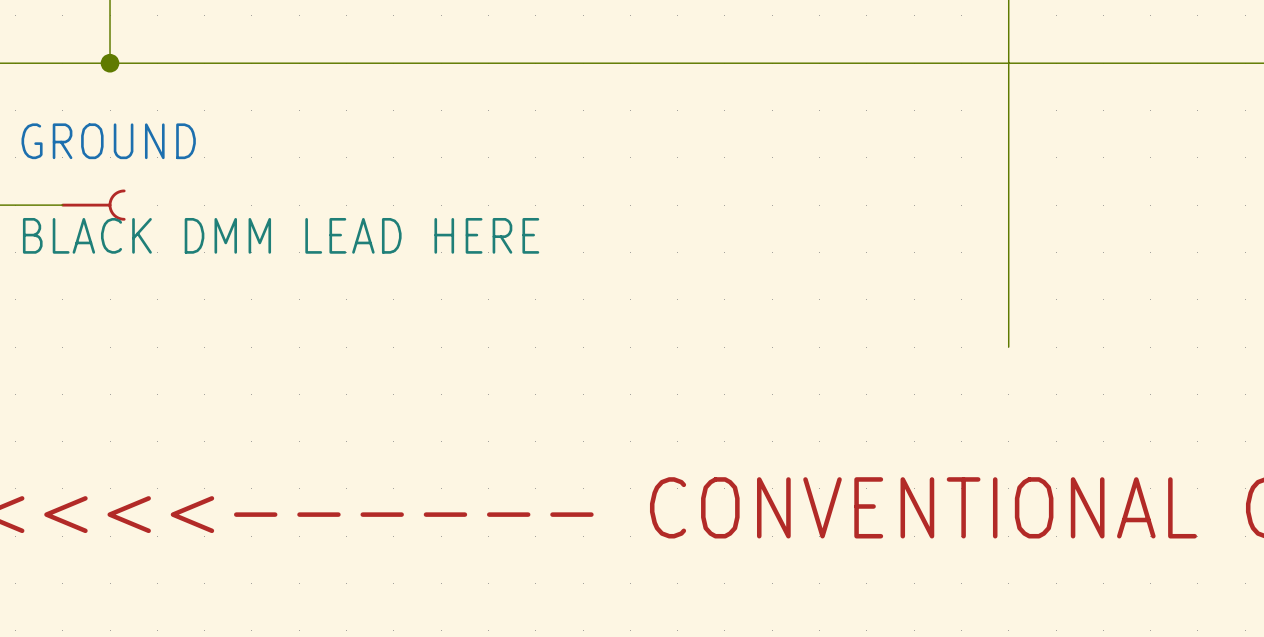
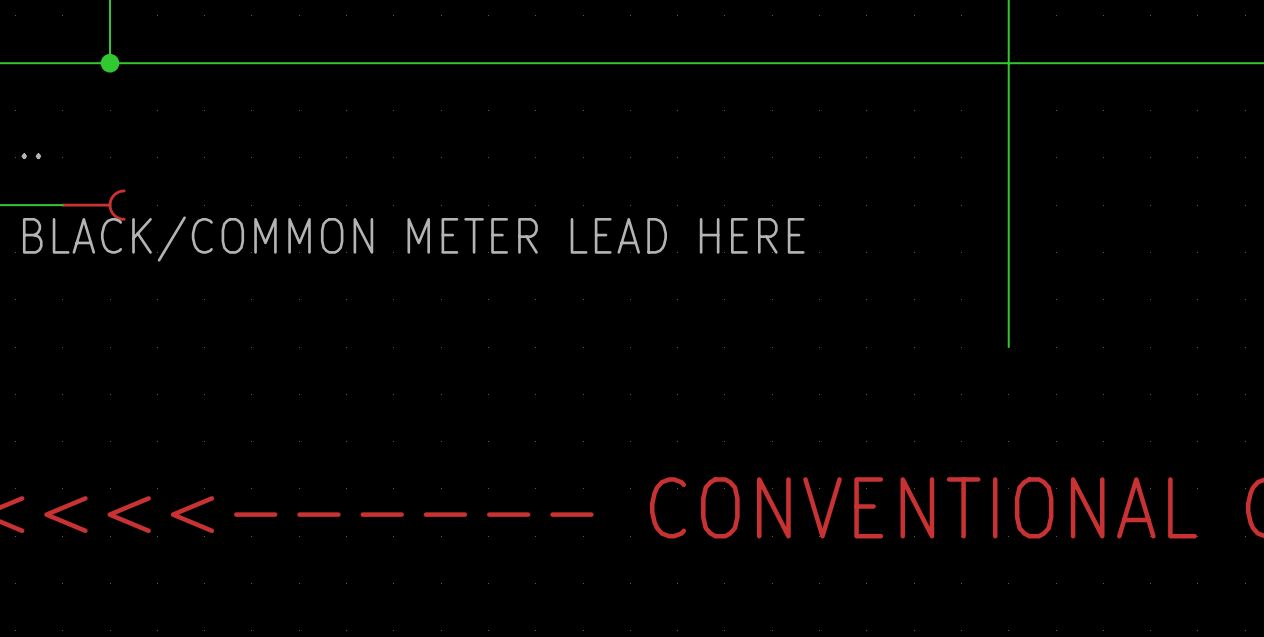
GROUND name: GROUND (108, 141) -> .. (31, 156)
GROUND value: BLACK DMM LEAD HERE (281, 235) -> BLACK/COMMON METER LEAD HERE (413, 239)

